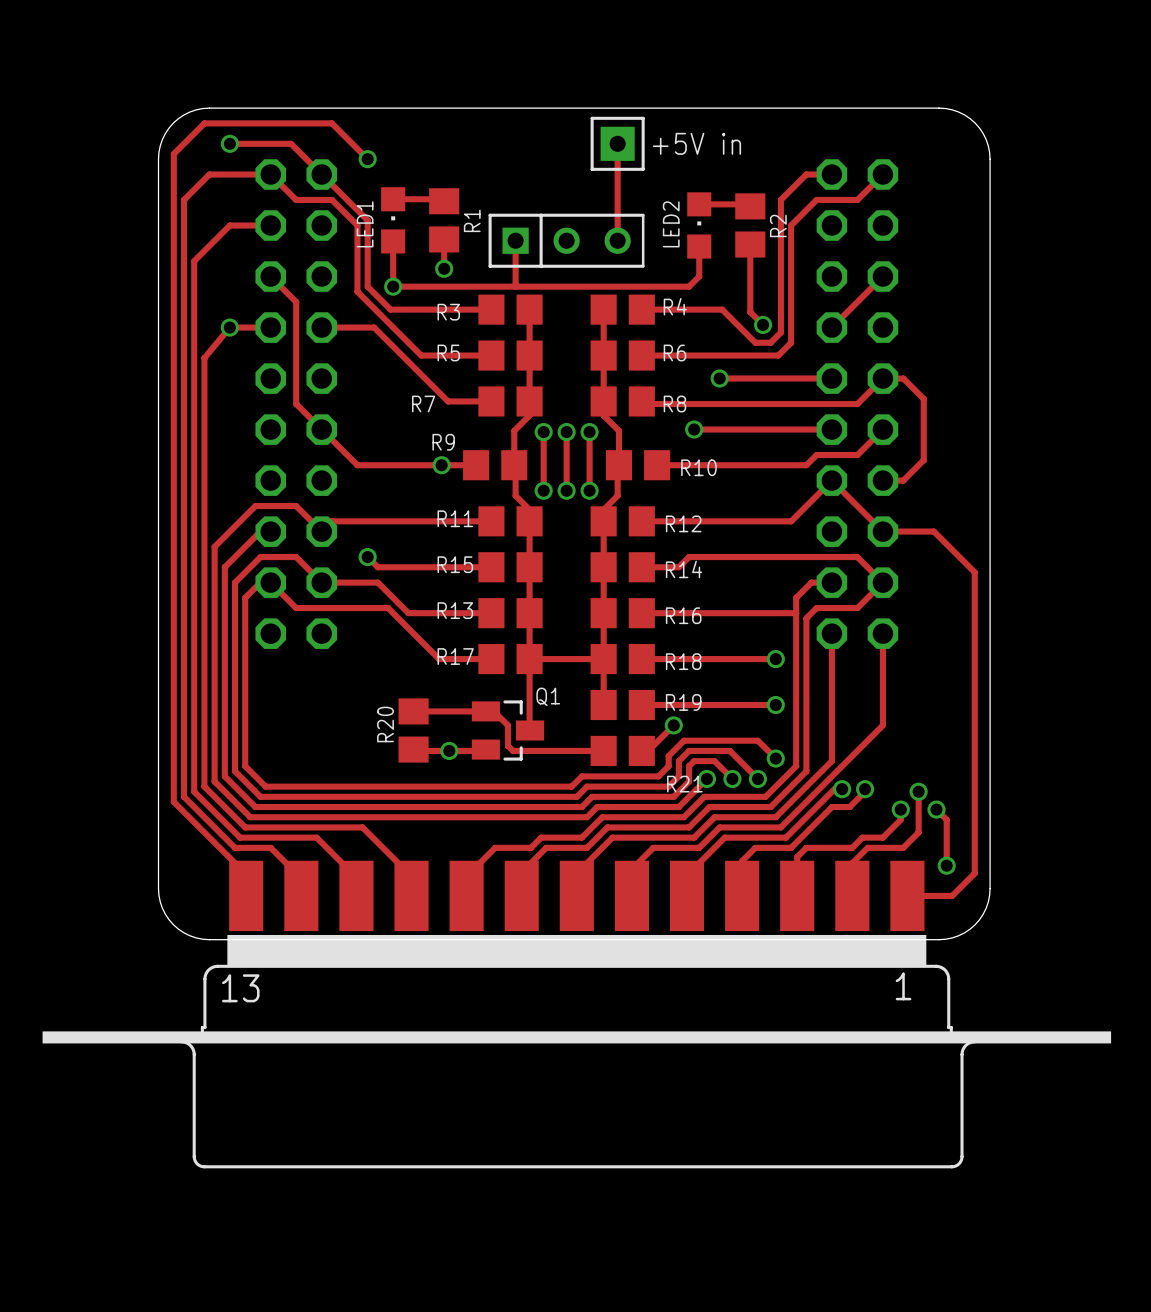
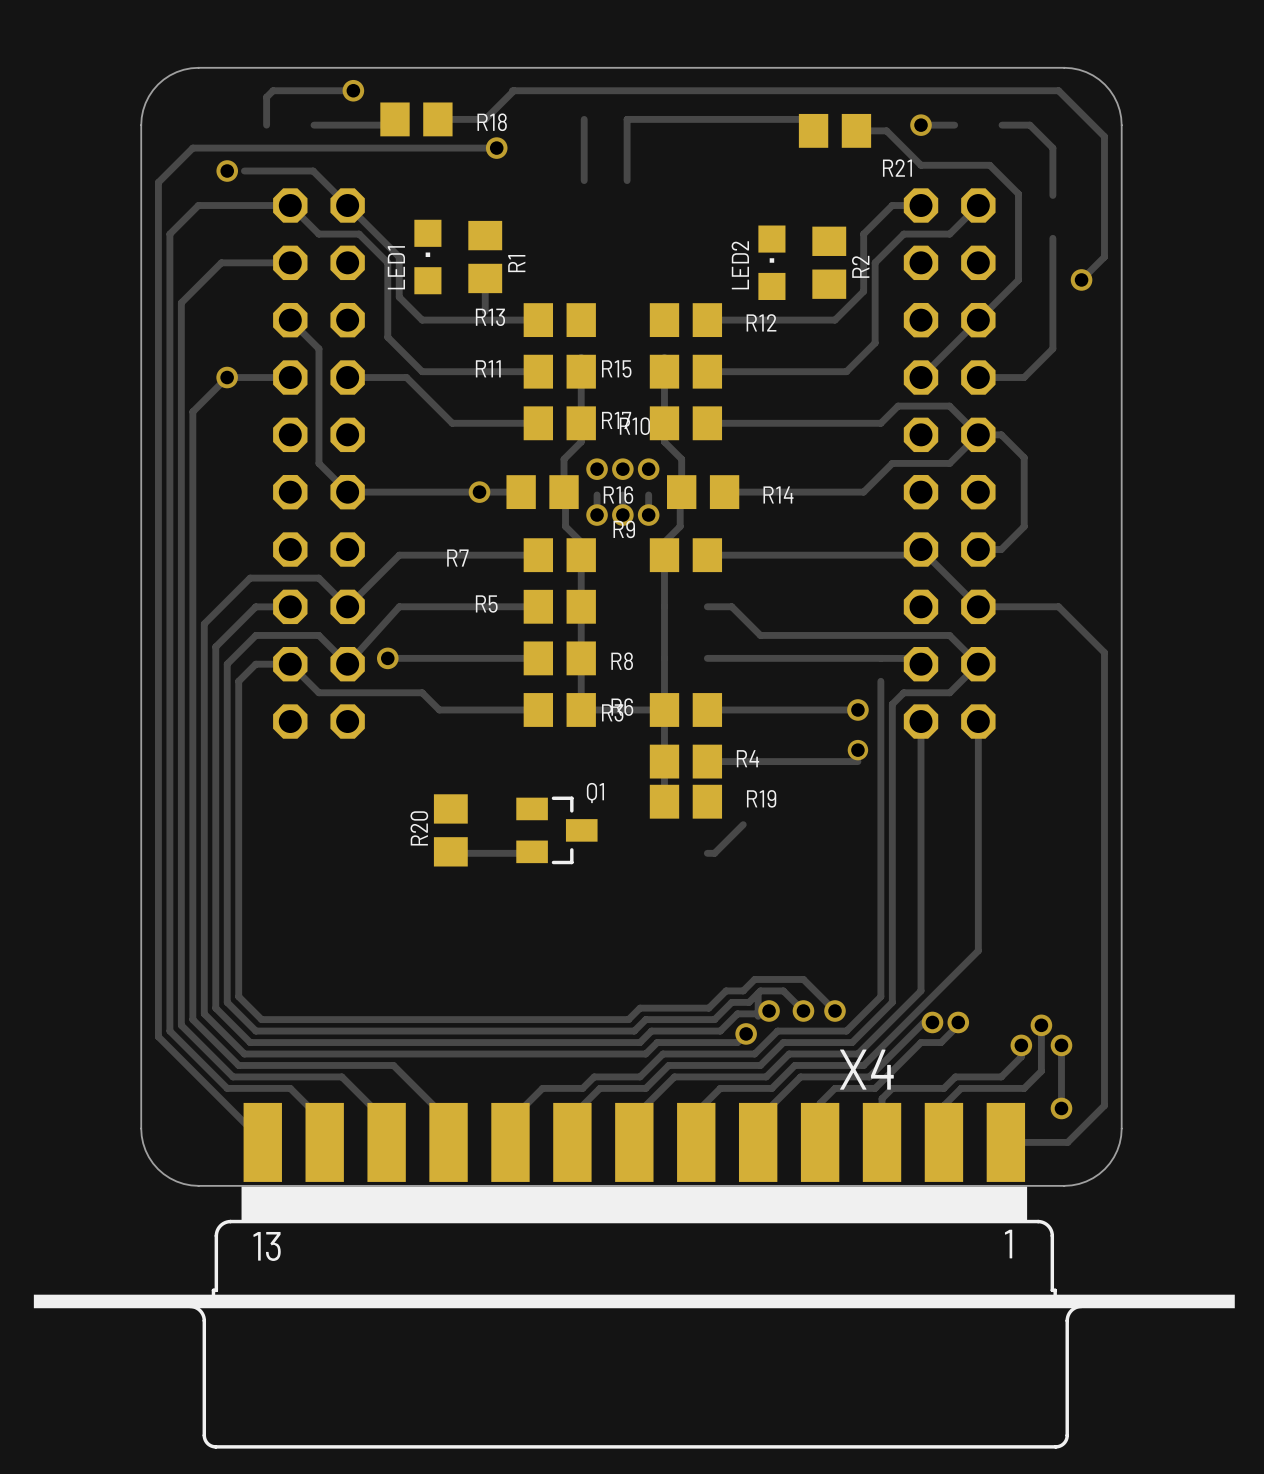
track: none -> (353, 90) (273, 90) (266, 97) (266, 125)
via: none -> (353, 90)
track: none -> (512, 90) (1058, 90) (1104, 136) (1104, 257) (1081, 279)
track: none -> (513, 90) (485, 119) (437, 119)
track: none -> (394, 119) (389, 125) (314, 125)
track: none -> (584, 119) (584, 180)
track: none -> (921, 125) (954, 125)
via: none -> (921, 125)
track: none -> (1002, 125) (1029, 125) (1052, 148) (1052, 195)
board edge: (209, 108) (939, 108) (958, 111) (975, 123) (986, 139) (990, 159) (990, 888) (986, 908) (975, 924) (958, 935) (939, 939) (209, 939) (189, 935) (173, 924) (162, 908) (158, 888) (158, 159) (162, 139) (173, 123) (189, 111) (209, 108) -> (198, 67) (176, 72) (158, 84) (145, 103) (141, 125) (141, 1128) (143, 1143) (153, 1163) (163, 1174) (176, 1181) (198, 1185) (1064, 1185) (1079, 1183) (1099, 1174) (1109, 1163) (1117, 1150) (1121, 1128) (1121, 125) (1119, 110) (1109, 90) (1099, 79) (1086, 72) (1064, 67) (198, 67)
track: none -> (813, 130) (802, 119) (627, 119) (627, 180)
track: none -> (856, 130) (886, 130) (921, 165) (989, 165) (1018, 193) (1018, 280) (978, 320)
track: (204, 123) (173, 154) (173, 261) -> (244, 262) (221, 262) (181, 302)
track: none -> (215, 148) (192, 148) (158, 182) (158, 1036) (262, 1142)
track: (331, 123) (367, 159) -> (359, 148) (496, 148)
via: none -> (496, 148)
via position: (229, 143) -> (227, 171)
track: (617, 143) (617, 240) -> none
part: (617, 143) -> none
text: +5V in (696, 143) -> none
via: (367, 159) -> none
track: (209, 174) (184, 199) (184, 358) -> (244, 377) (227, 377) (192, 411)
track: none -> (221, 205) (198, 205) (169, 234) (169, 1031) (227, 1088) (290, 1088) (324, 1122) (324, 1142)
track: (393, 199) (437, 199) (444, 201) (442, 199) -> none
track: none -> (1052, 238) (1052, 348) (1024, 377) (978, 377)
track: (699, 204) (748, 204) (750, 206) -> none
track: (229, 225) (194, 261) (194, 546) -> none
track: (515, 240) (515, 286) -> none
part: (566, 240) -> none
via: none -> (1081, 279)
track: (393, 241) (393, 286) (689, 286) (699, 276) (699, 246) -> none
track: (750, 244) (750, 312) (763, 324) -> none
track: (780, 250) (780, 332) (770, 342) (755, 342) (722, 309) (641, 309) -> (863, 291) (835, 320) (707, 320)
track: (367, 256) (367, 286) (390, 309) (491, 309) -> (399, 297) (422, 320) (538, 320)
via: (444, 268) -> none
via: (393, 286) -> none
track: (791, 296) (791, 342) (778, 355) (641, 355) -> (875, 343) (846, 371) (707, 371)
R3 position: (510, 309) -> (685, 709)
R4 position: (622, 309) -> (685, 761)
track: (388, 322) (421, 355) (491, 355) -> (422, 371) (538, 371)
via: (763, 324) -> none
track: (229, 327) (204, 358) (204, 567) -> none
via position: (229, 327) -> (227, 377)
R5 position: (510, 355) -> (559, 606)
R6 position: (622, 355) -> (559, 709)
track: (414, 368) (448, 401) (491, 401) -> (452, 423) (538, 423)
track: none -> (707, 423) (880, 423) (898, 406) (949, 406) (978, 434)
track: (719, 378) (831, 378) -> none
via: (719, 378) -> none
track: (529, 384) (529, 415) (514, 430) (515, 495) (529, 509) -> (581, 441) (564, 459) (565, 526) (581, 542) (581, 582)
track: (603, 384) (603, 415) (618, 430) (617, 495) (603, 509) -> (664, 441) (681, 459) (680, 526) (664, 542) (664, 582)
R7 position: (510, 401) -> (559, 555)
R8 position: (622, 401) -> (559, 658)
track: (641, 401) (644, 404) (806, 404) -> none
via: none -> (597, 469)
via: none -> (622, 469)
via: none -> (648, 469)
track: (321, 429) (357, 465) (476, 465) -> (347, 492) (521, 492)
via: none -> (479, 492)
track: none -> (724, 492) (766, 492)
via: (694, 429) -> none
track: (780, 429) (831, 429) -> (863, 492) (892, 463)
track: (882, 429) (857, 455) (816, 455) (806, 465) (657, 465) -> none
via position: (543, 432) -> (597, 515)
via position: (566, 432) -> (622, 515)
via position: (589, 432) -> (648, 515)
track: (543, 449) (543, 490) -> none
track: (566, 449) (566, 490) -> none
track: (589, 449) (589, 490) -> none
via: (441, 465) -> none
R9 position: (495, 465) -> (685, 555)
R10 position: (638, 465) -> (559, 423)
track: (831, 480) (791, 521) (641, 521) -> (920, 549) (915, 555) (707, 555)
via: (543, 490) -> none
via: (566, 490) -> none
via: (589, 490) -> none
track: (255, 506) (214, 546) (214, 582) -> (273, 578) (250, 578) (204, 623)
track: (332, 521) (491, 521) -> (359, 595) (399, 555) (538, 555)
R11 position: (510, 521) -> (559, 371)
R12 position: (622, 521) -> (685, 320)
track: (260, 531) (224, 567) (224, 597) -> (278, 606) (255, 606) (215, 646)
track: (933, 531) (974, 572) (974, 873) (952, 895) (907, 895) -> (1035, 606) (1058, 606) (1104, 652) (1104, 1105) (1067, 1142) (1005, 1142)
track: (260, 557) (235, 582) (235, 771) (260, 796) (576, 796) (587, 786) (668, 786) (678, 776) (678, 761) (689, 750) (729, 750) (757, 778) -> (278, 635) (255, 635) (227, 664)
track: (367, 557) (377, 567) (491, 567) -> none
via: (367, 557) -> none
track: (689, 557) (678, 567) (641, 567) -> (760, 635) (731, 606) (707, 606)
R15 position: (510, 567) -> (685, 371)
R14 position: (622, 567) -> (703, 492)
track: none -> (387, 658) (538, 658)
via: none -> (387, 658)
track: (260, 582) (245, 597) (245, 766) (265, 786) (571, 786) (581, 776) (658, 776) (668, 766) (668, 756) (683, 740) (757, 740) (775, 758) -> (278, 664) (255, 664) (238, 681)
track: (321, 582) (377, 582) (408, 613) (491, 613) -> (347, 664) (399, 606) (538, 606)
track: (831, 582) (811, 582) (796, 597) -> (921, 664) (915, 658) (707, 658)
R13 position: (510, 613) -> (559, 320)
R16 position: (622, 613) -> (542, 492)
track: (641, 613) (796, 613) -> none
track: (403, 623) (439, 659) (491, 659) -> (439, 709) (538, 709)
track: (529, 623) (530, 730) -> (581, 709) (664, 709)
via: none -> (857, 709)
R17 position: (510, 659) -> (685, 423)
track: (529, 659) (603, 659) -> none
R18 position: (622, 659) -> (416, 119)
track: (641, 659) (775, 659) -> (707, 709) (857, 709)
track: (641, 705) (775, 705) -> (707, 761) (857, 761)
via: (775, 705) -> none
track: (413, 711) (496, 711) -> none
track: (493, 711) (507, 725) (507, 745) (513, 750) (603, 750) -> none
via: (673, 725) -> none
track: (882, 725) (780, 827) (719, 827) (699, 847) (653, 847) (631, 869) (631, 895) -> (978, 824) (978, 950) (863, 1065) (794, 1065) (771, 1088) (720, 1088) (696, 1112) (696, 1142)
via: (449, 750) -> none
R21 position: (622, 750) -> (835, 130)
via: (775, 758) -> none
track: (831, 761) (775, 817) (714, 817) (694, 837) (612, 837) (576, 873) (576, 895) -> (921, 864) (921, 990) (857, 1054) (789, 1054) (766, 1076) (674, 1076) (634, 1117) (634, 1142)
track: (796, 766) (765, 796) (704, 796) (683, 817) (602, 817) (581, 837) (541, 837) (530, 847) (495, 847) (466, 876) (466, 895) -> (880, 870) (880, 996) (846, 1031) (777, 1031) (754, 1054) (662, 1054) (640, 1076) (594, 1076) (582, 1088) (542, 1088) (510, 1120) (510, 1142)
track: (806, 771) (770, 807) (709, 807) (689, 827) (607, 827) (587, 847) (546, 847) (520, 873) (521, 895) -> (892, 876) (892, 1002) (852, 1042) (783, 1042) (760, 1065) (668, 1065) (645, 1088) (599, 1088) (571, 1117) (572, 1142)
track: (224, 776) (255, 807) (581, 807) (592, 796) (673, 796) (689, 781) (689, 766) (694, 761) (714, 761) (732, 778) -> (238, 881) (238, 996) (261, 1019) (628, 1019) (640, 1008) (708, 1008) (726, 990) (743, 990) (754, 979) (803, 979) (835, 1011)
track: (706, 778) (678, 807) (597, 807) (587, 817) (250, 817) (214, 781) -> (758, 993) (749, 1002) (731, 1002) (714, 1019) (645, 1019) (634, 1031) (255, 1031) (227, 1002) (227, 887)
via: (706, 778) -> none
via: (732, 778) -> none
via: (757, 778) -> none
track: (204, 786) (245, 827) (362, 827) (411, 876) (411, 895) -> (215, 893) (215, 1008) (250, 1042) (640, 1042) (651, 1031) (720, 1031) (737, 1013) (766, 1013) (769, 1011)
track: (842, 789) (834, 789) (786, 837) (724, 837) (689, 873) -> (803, 1011) (783, 990) (760, 990)
via: (842, 789) -> none
track: (865, 789) (865, 791) (849, 807) (831, 807) (791, 847) (755, 847) (742, 861) (742, 895) -> (958, 1022) (958, 1025) (941, 1042) (921, 1042) (875, 1088) (835, 1088) (820, 1103) (820, 1142)
via: (865, 789) -> none
track: (194, 791) (240, 837) (316, 837) (357, 878) (356, 895) -> (204, 899) (204, 1013) (244, 1054) (645, 1054) (657, 1042) (737, 1042) (746, 1033)
track: (918, 791) (918, 832) (903, 847) (867, 847) (852, 863) (852, 909) -> none
via: (918, 791) -> none
track: (184, 796) (235, 847) (270, 847) (301, 878) (301, 895) -> (192, 904) (192, 1019) (238, 1065) (393, 1065) (448, 1120) (448, 1142)
track: (173, 801) (246, 874) (246, 895) -> (181, 910) (181, 1025) (232, 1076) (341, 1076) (387, 1122) (386, 1142)
track: (900, 809) (900, 819) (882, 837) (862, 837) (852, 847) (806, 847) (797, 857) (797, 904) -> none
via: (900, 809) -> none
track: (936, 809) (946, 819) (946, 865) -> none
via: (936, 809) -> none
via: (946, 865) -> none
via: none -> (769, 1011)
via: none -> (803, 1011)
via: none -> (835, 1011)
track: none -> (932, 1022) (923, 1022) (869, 1076) (800, 1076) (758, 1119) (758, 1142)
via: none -> (932, 1022)
via: none -> (958, 1022)
track: none -> (1041, 1025) (1041, 1071) (1024, 1088) (961, 1088) (943, 1105) (943, 1157)
via: none -> (1041, 1025)
via: none -> (746, 1033)
track: none -> (1021, 1045) (1021, 1056) (1001, 1076) (955, 1076) (943, 1088) (892, 1088) (882, 1098) (882, 1152)
via: none -> (1021, 1045)
track: none -> (1061, 1045) (1061, 1108)
via: none -> (1061, 1045)
via: none -> (1061, 1108)
part: (576, 1014) -> none
X4: none -> (634, 1275)

